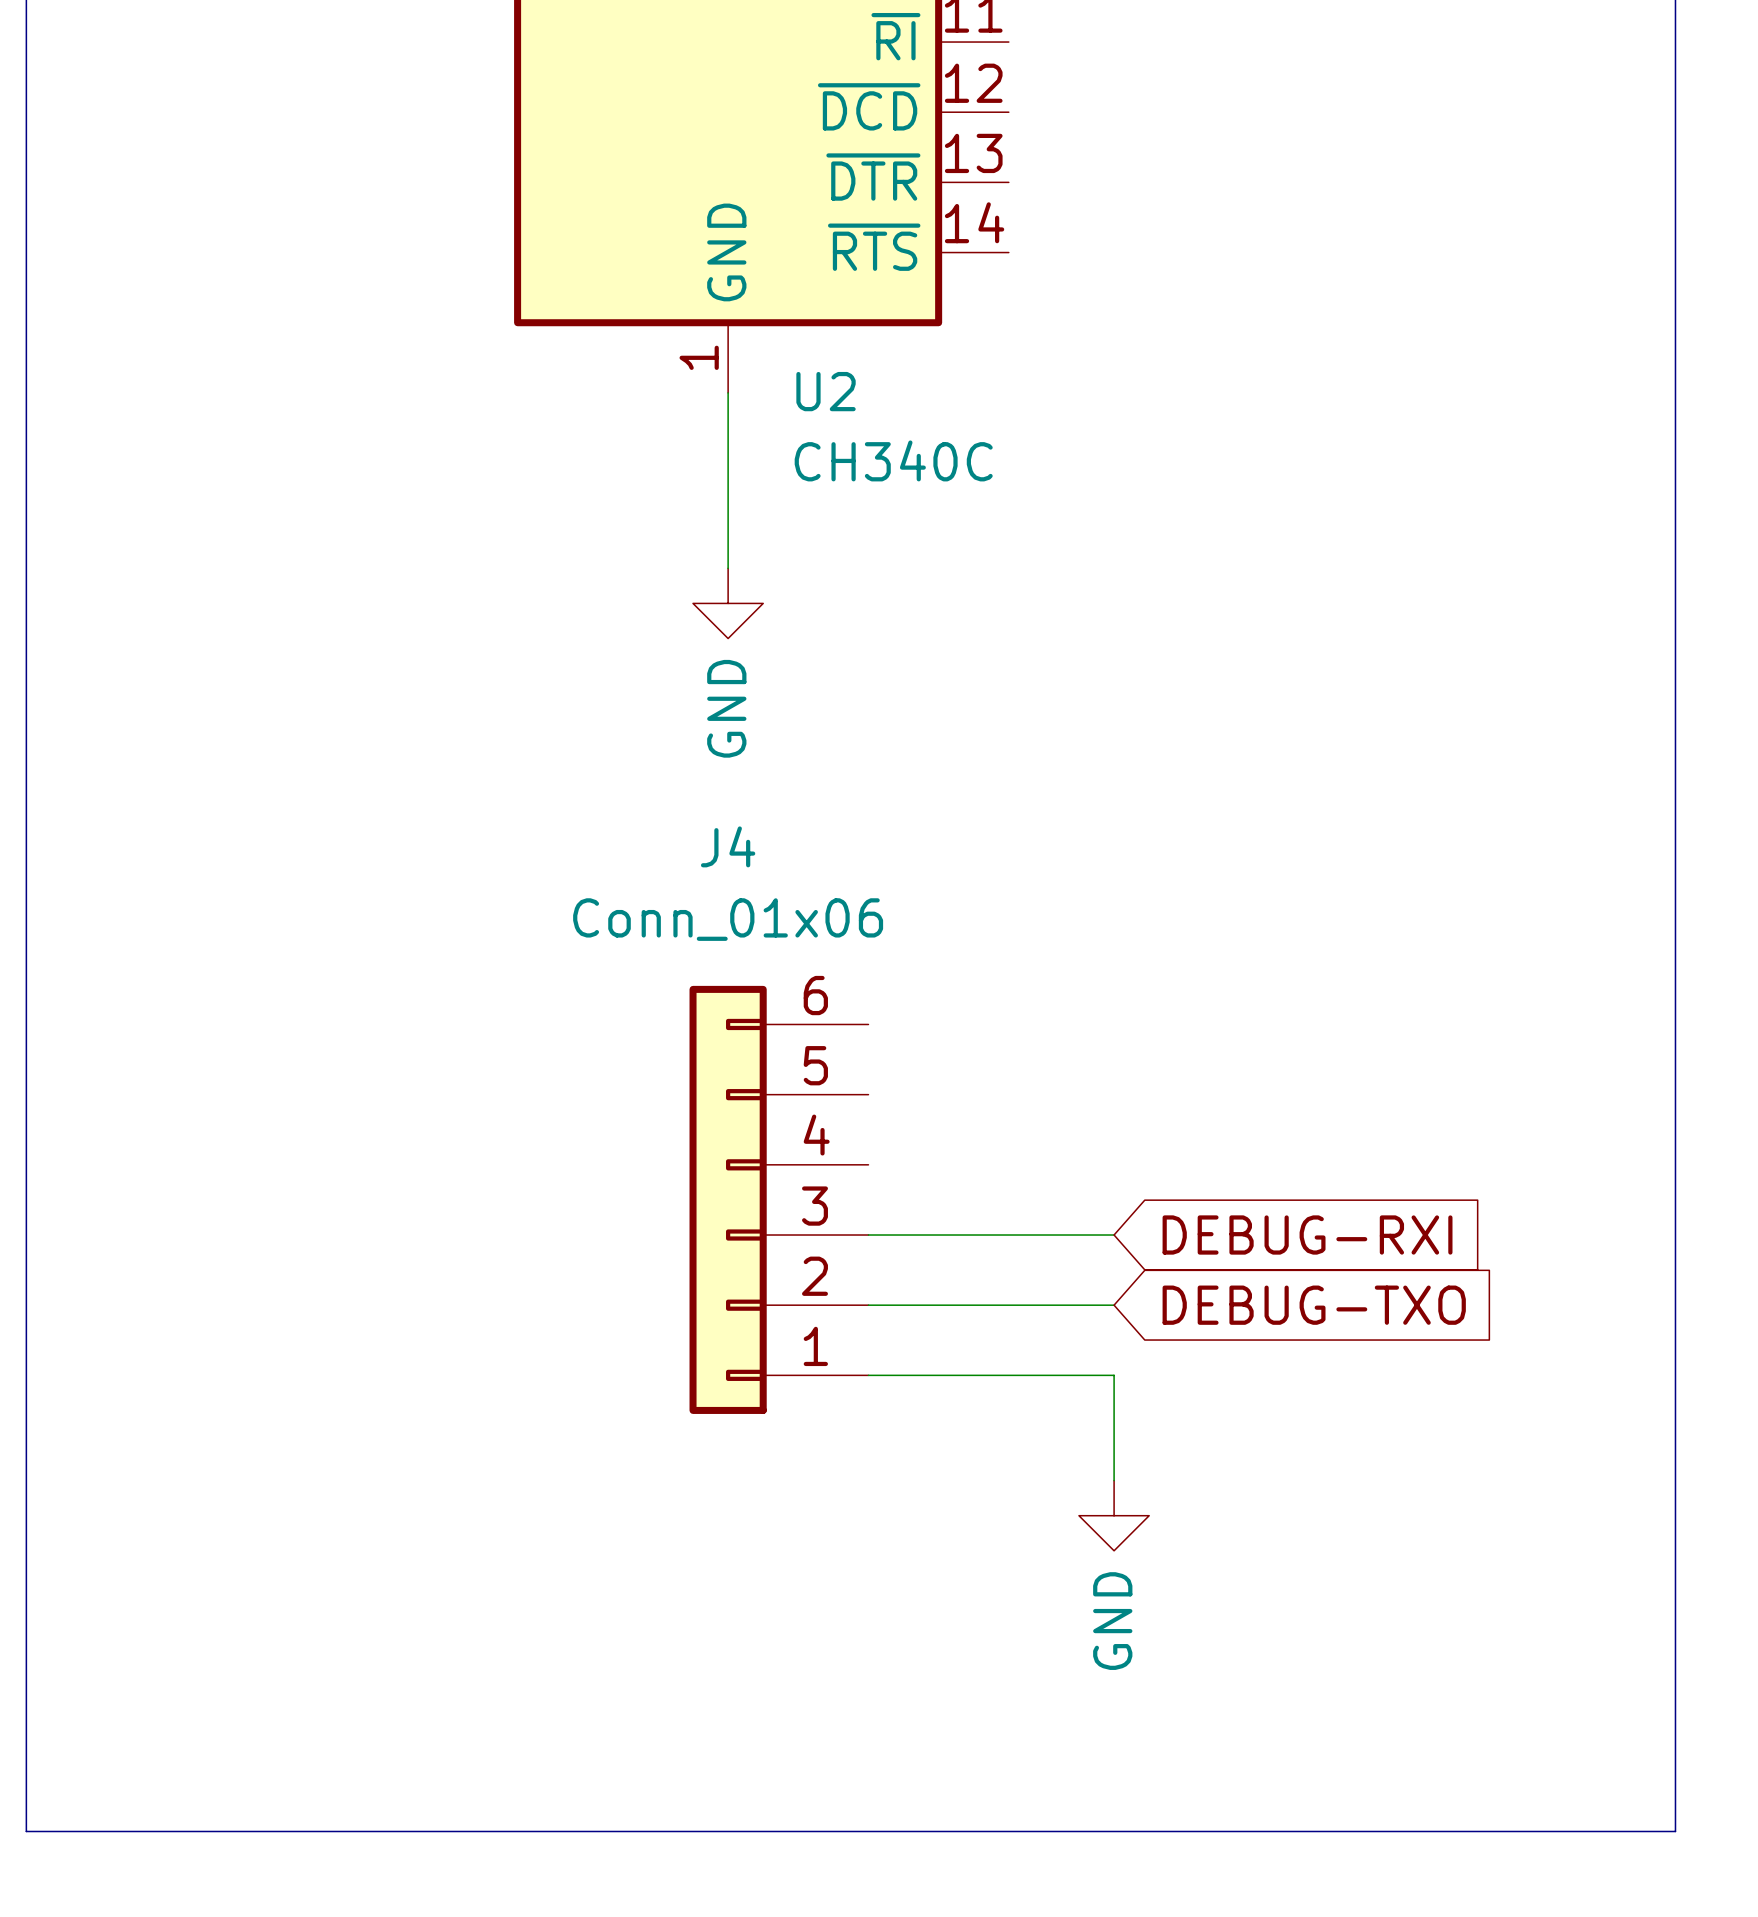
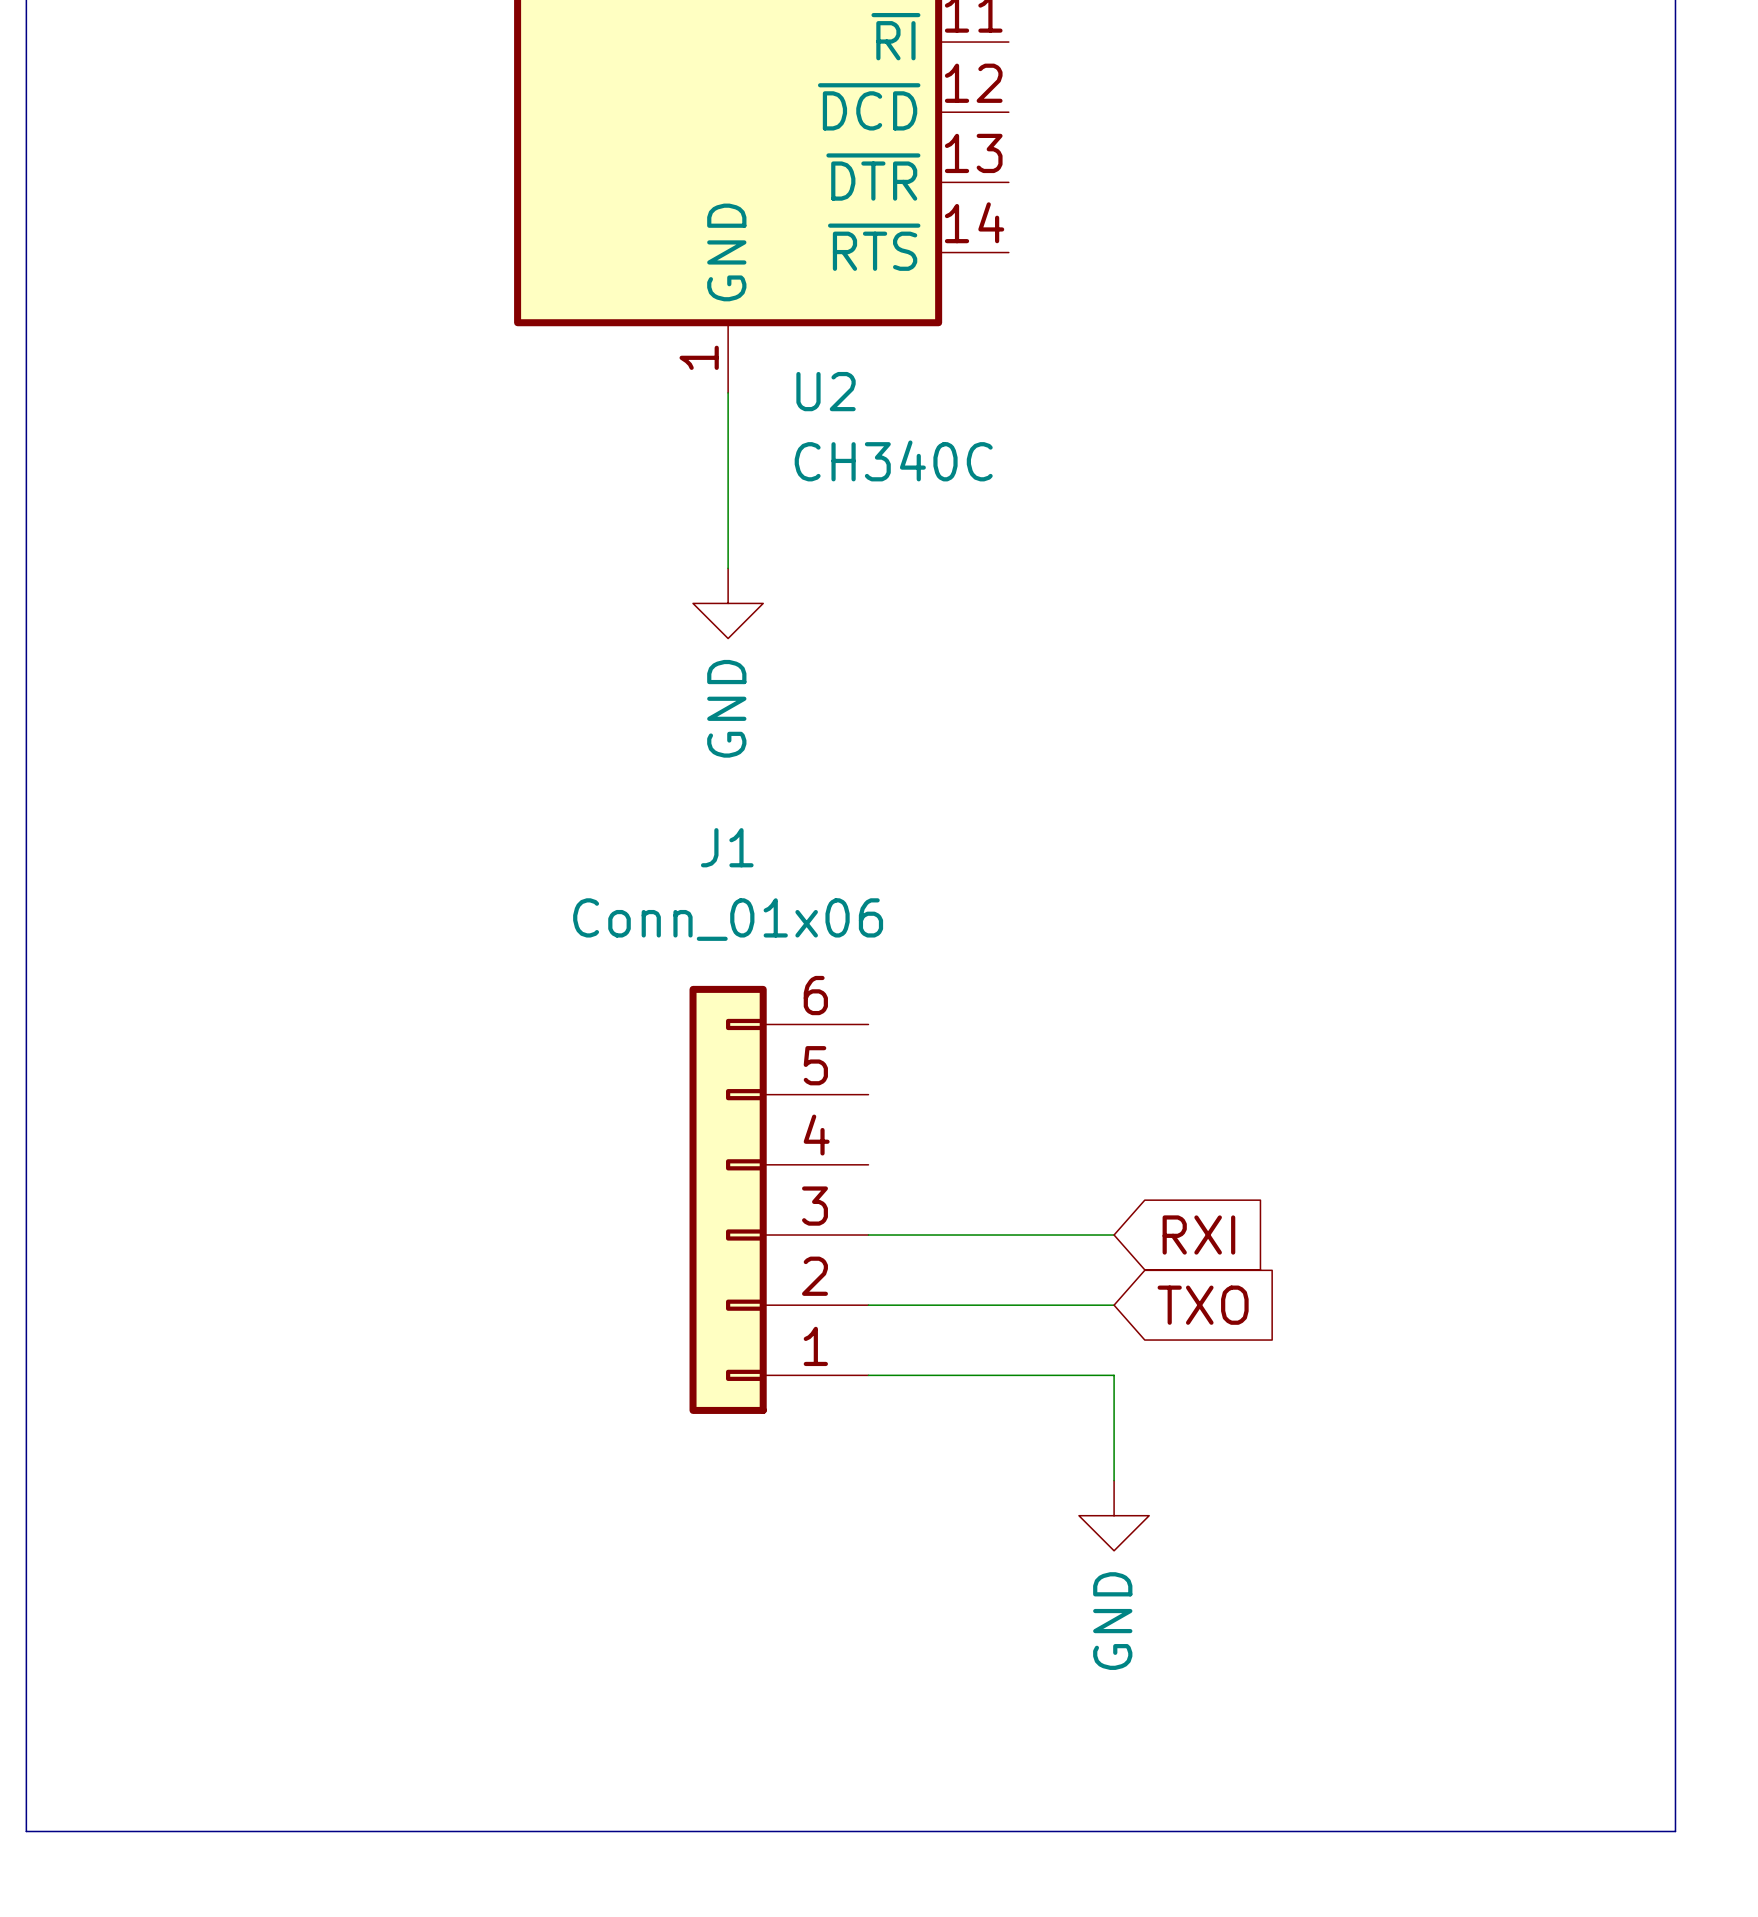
J4 name: J4 (728, 846) -> J1 (727, 847)
global label: DEBUG-RXI (1307, 1235) -> RXI (1198, 1235)
global label: DEBUG-TXO (1314, 1305) -> TXO (1203, 1305)

